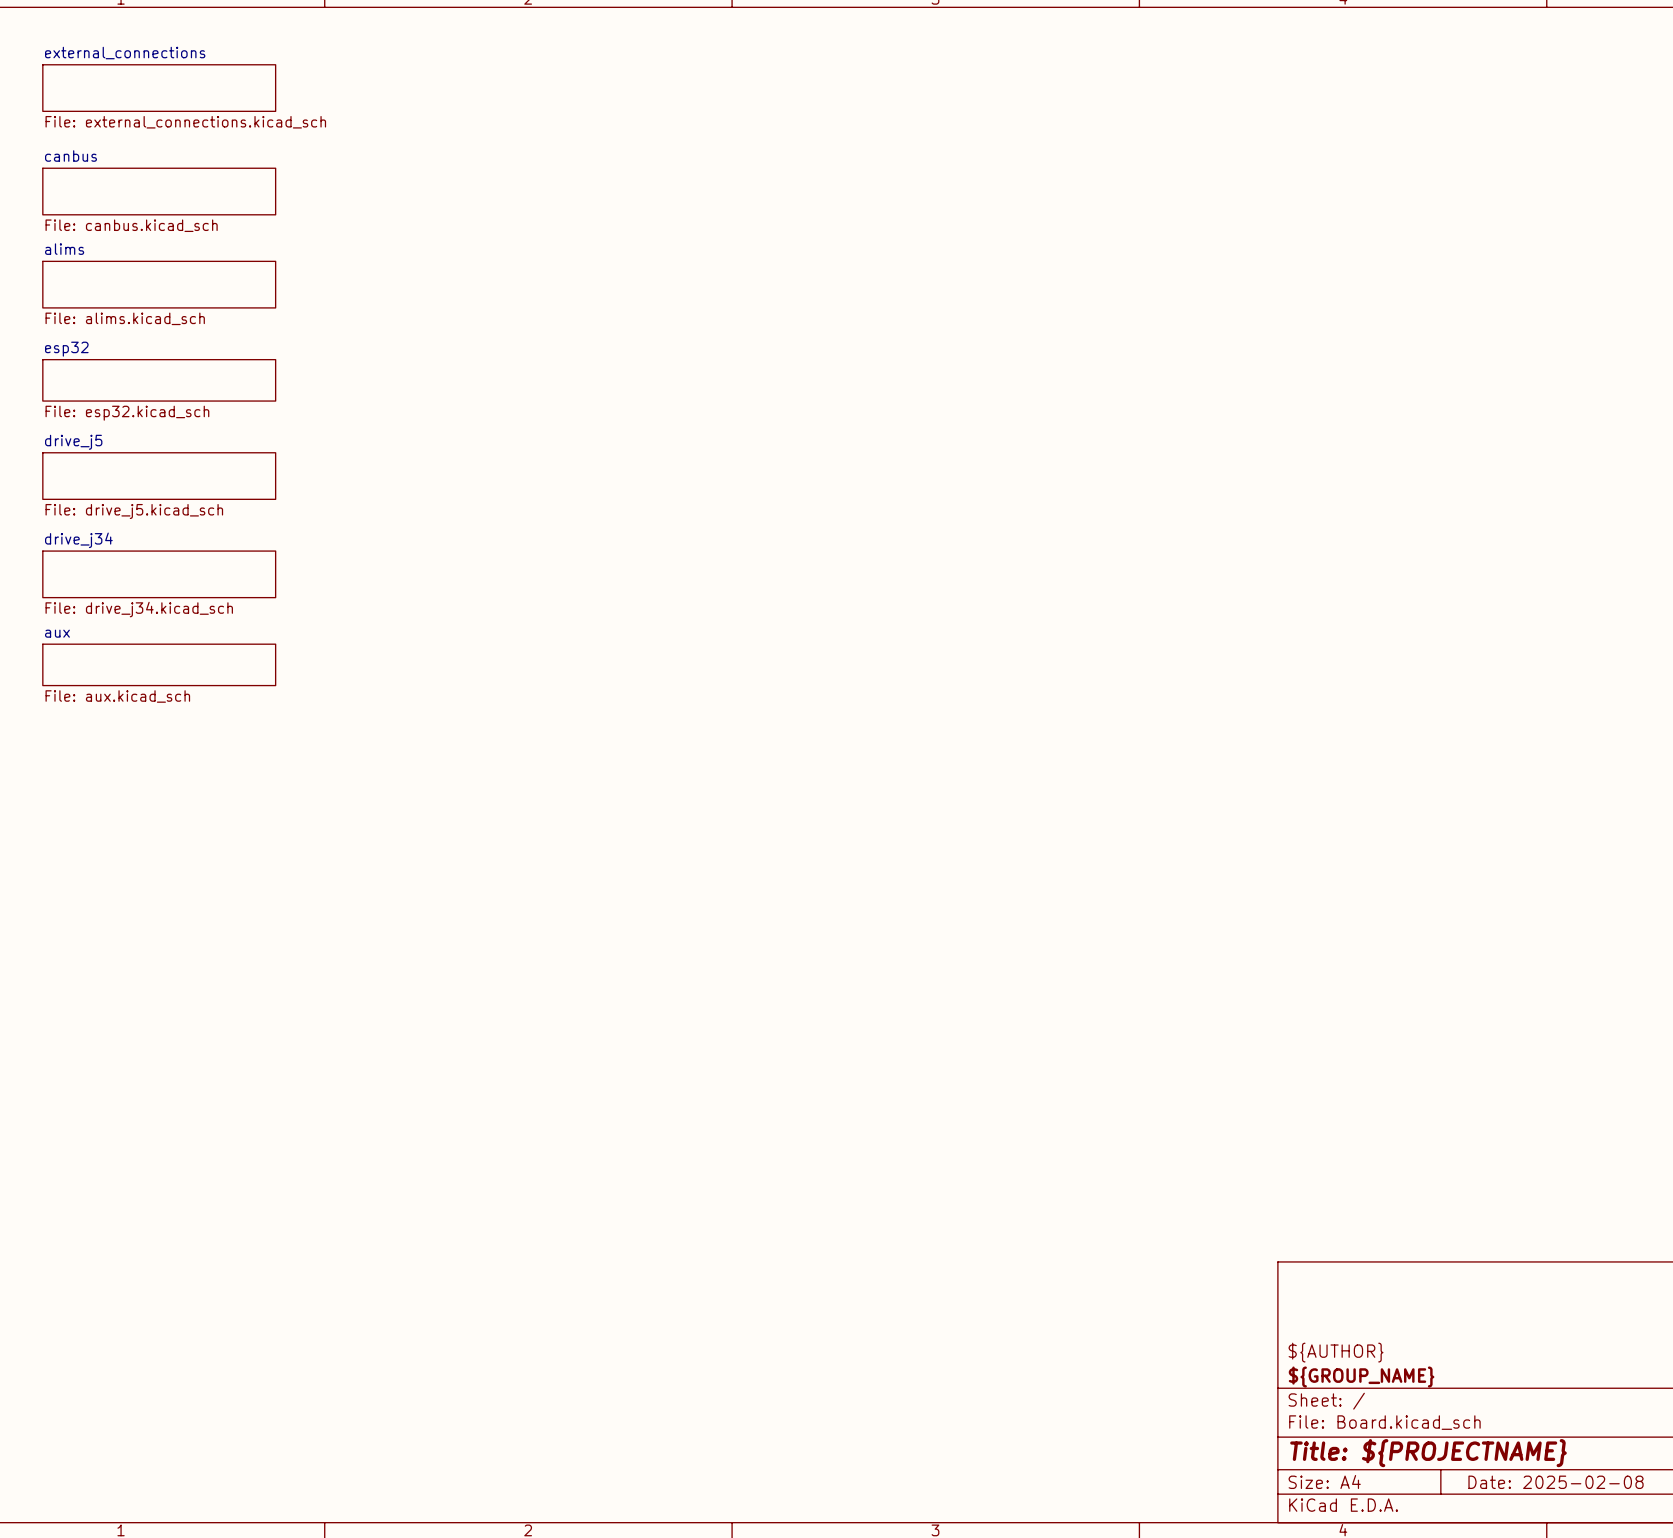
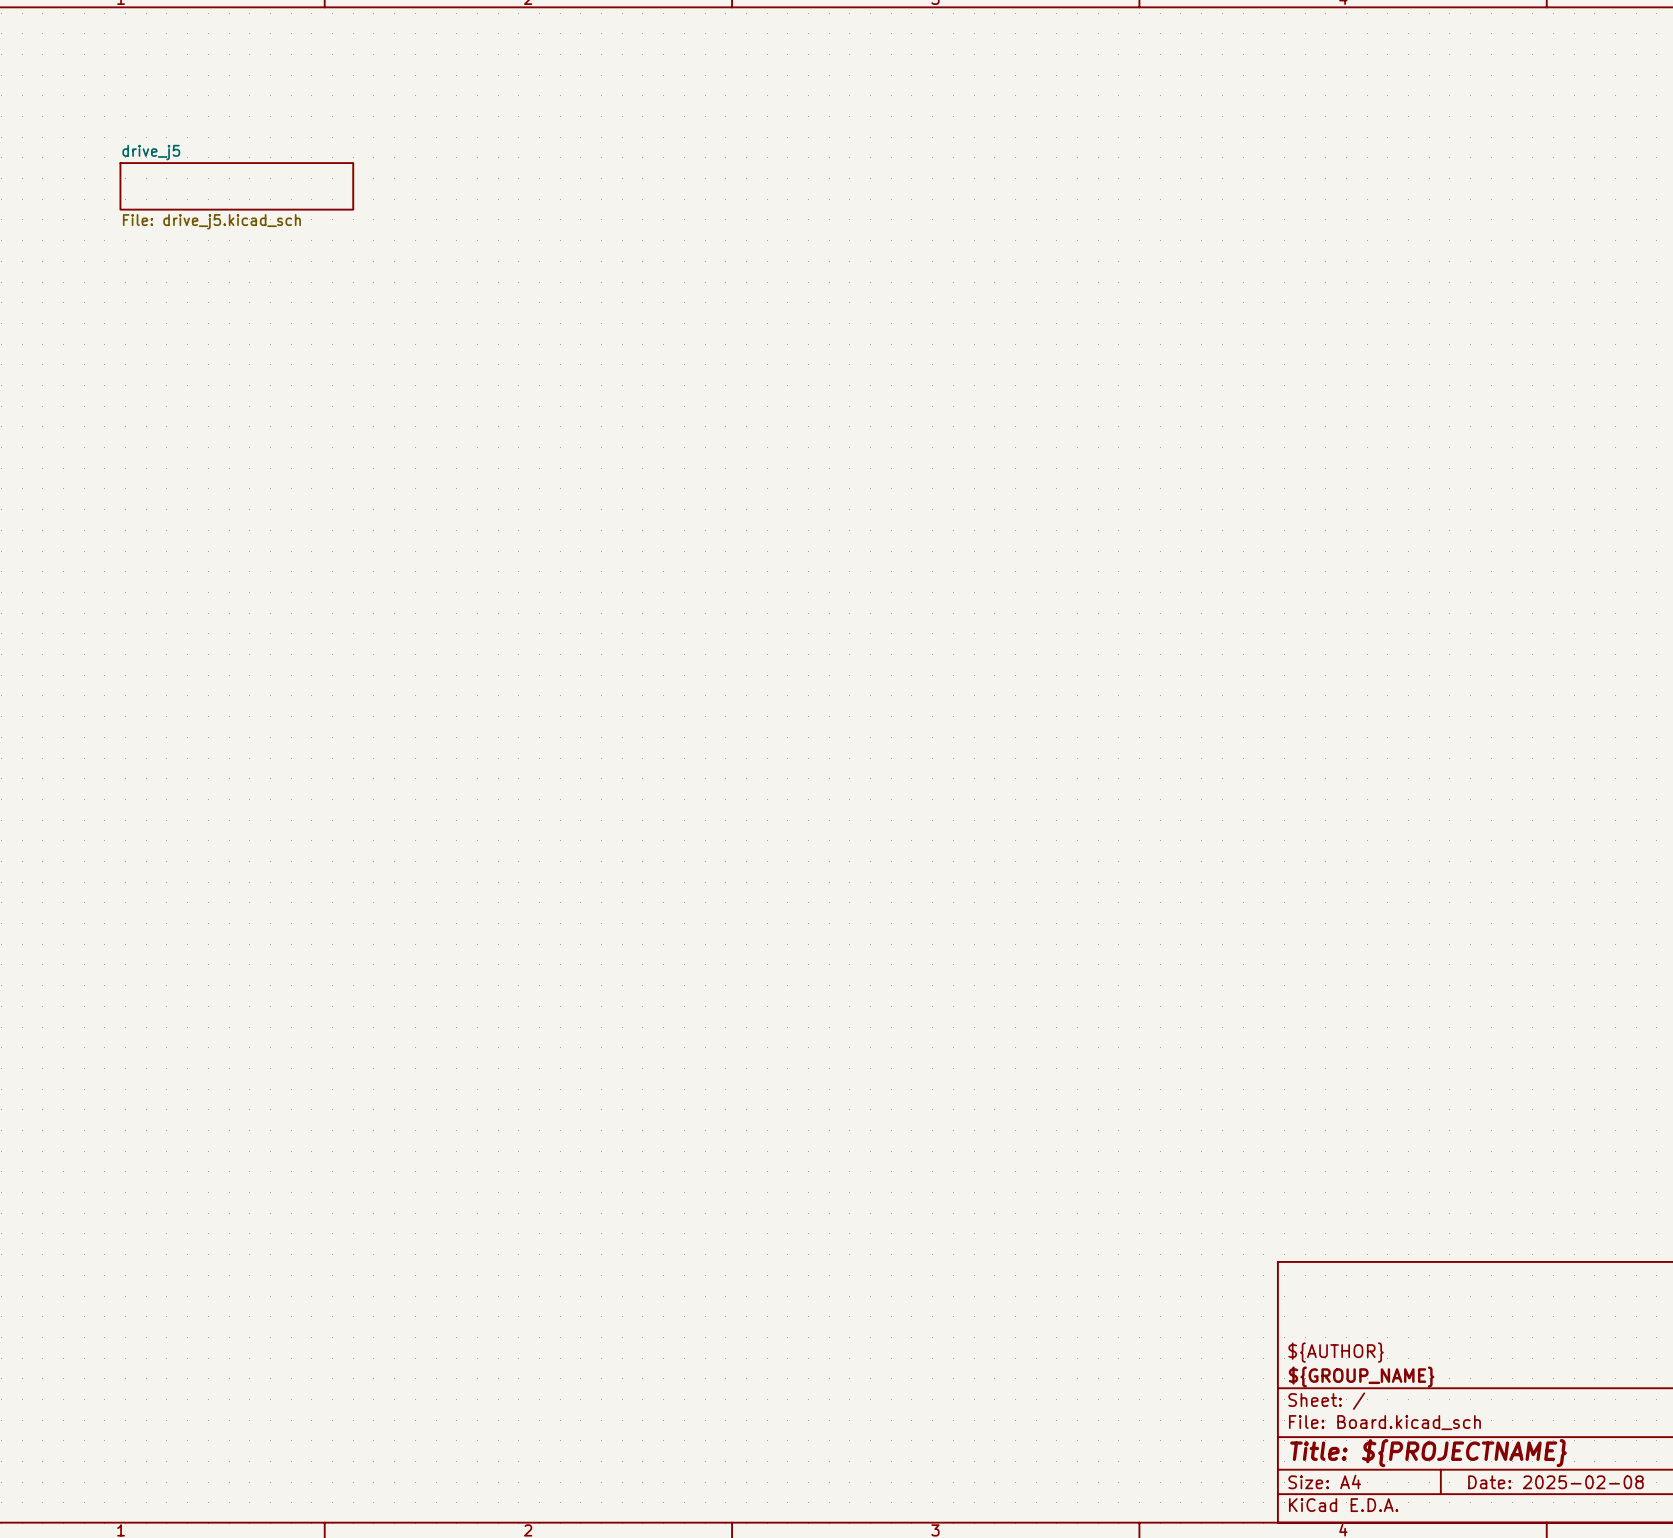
sheet external_connections: File: external_connections.kicad_sch (159, 88) -> none
sheet canbus: File: canbus.kicad_sch (159, 191) -> none
sheet alims: File: alims.kicad_sch (159, 284) -> none
sheet esp32: File: esp32.kicad_sch (159, 380) -> none
sheet drive_j5 position: (159, 476) -> (236, 186)
sheet drive_j34: File: drive_j34.kicad_sch (159, 574) -> none
sheet aux: File: aux.kicad_sch (159, 664) -> none

